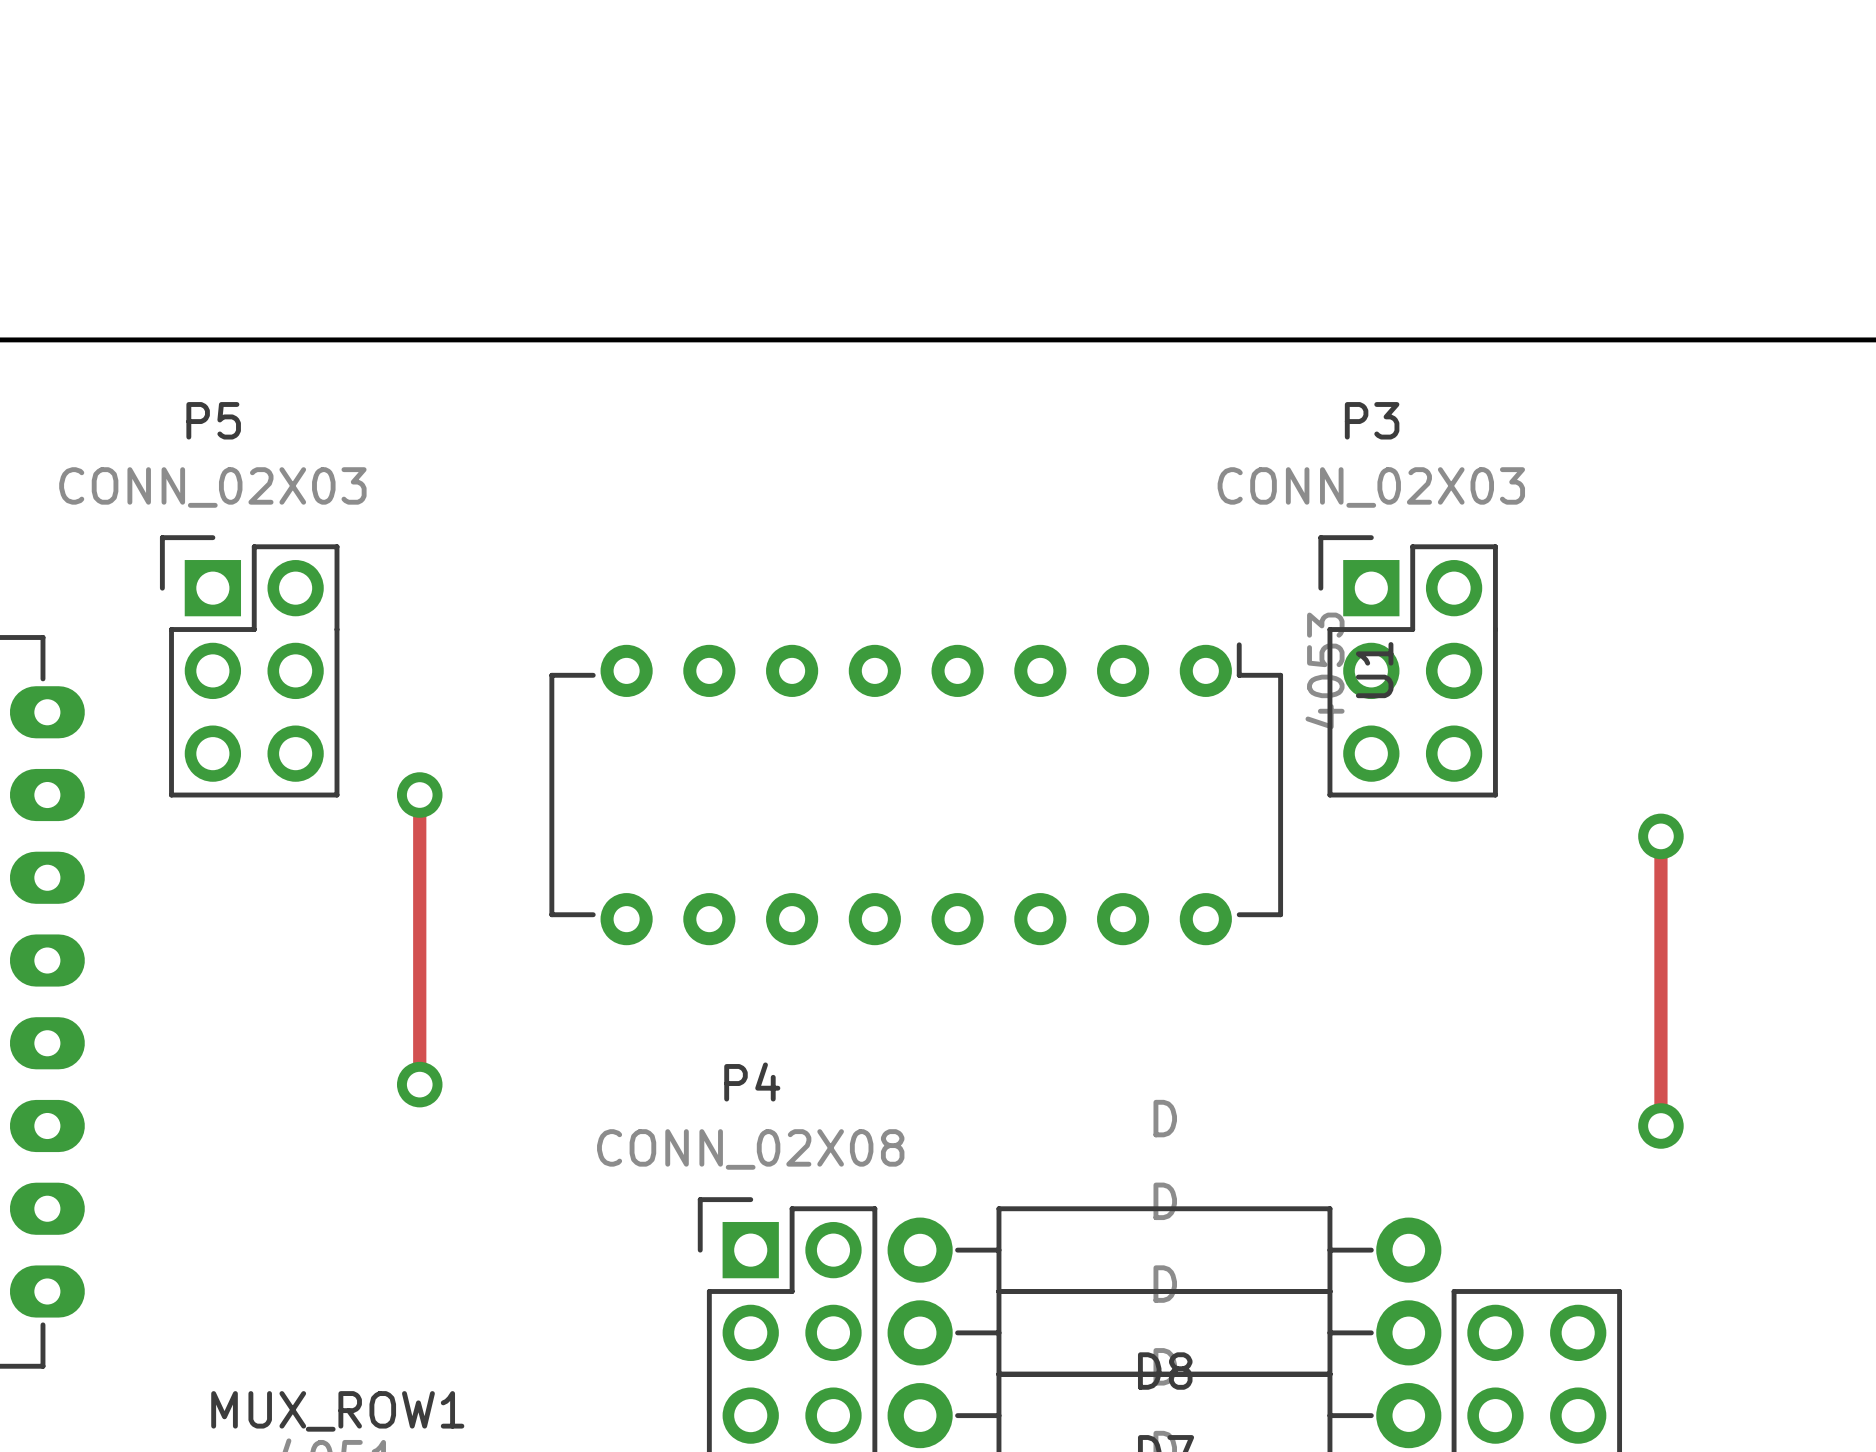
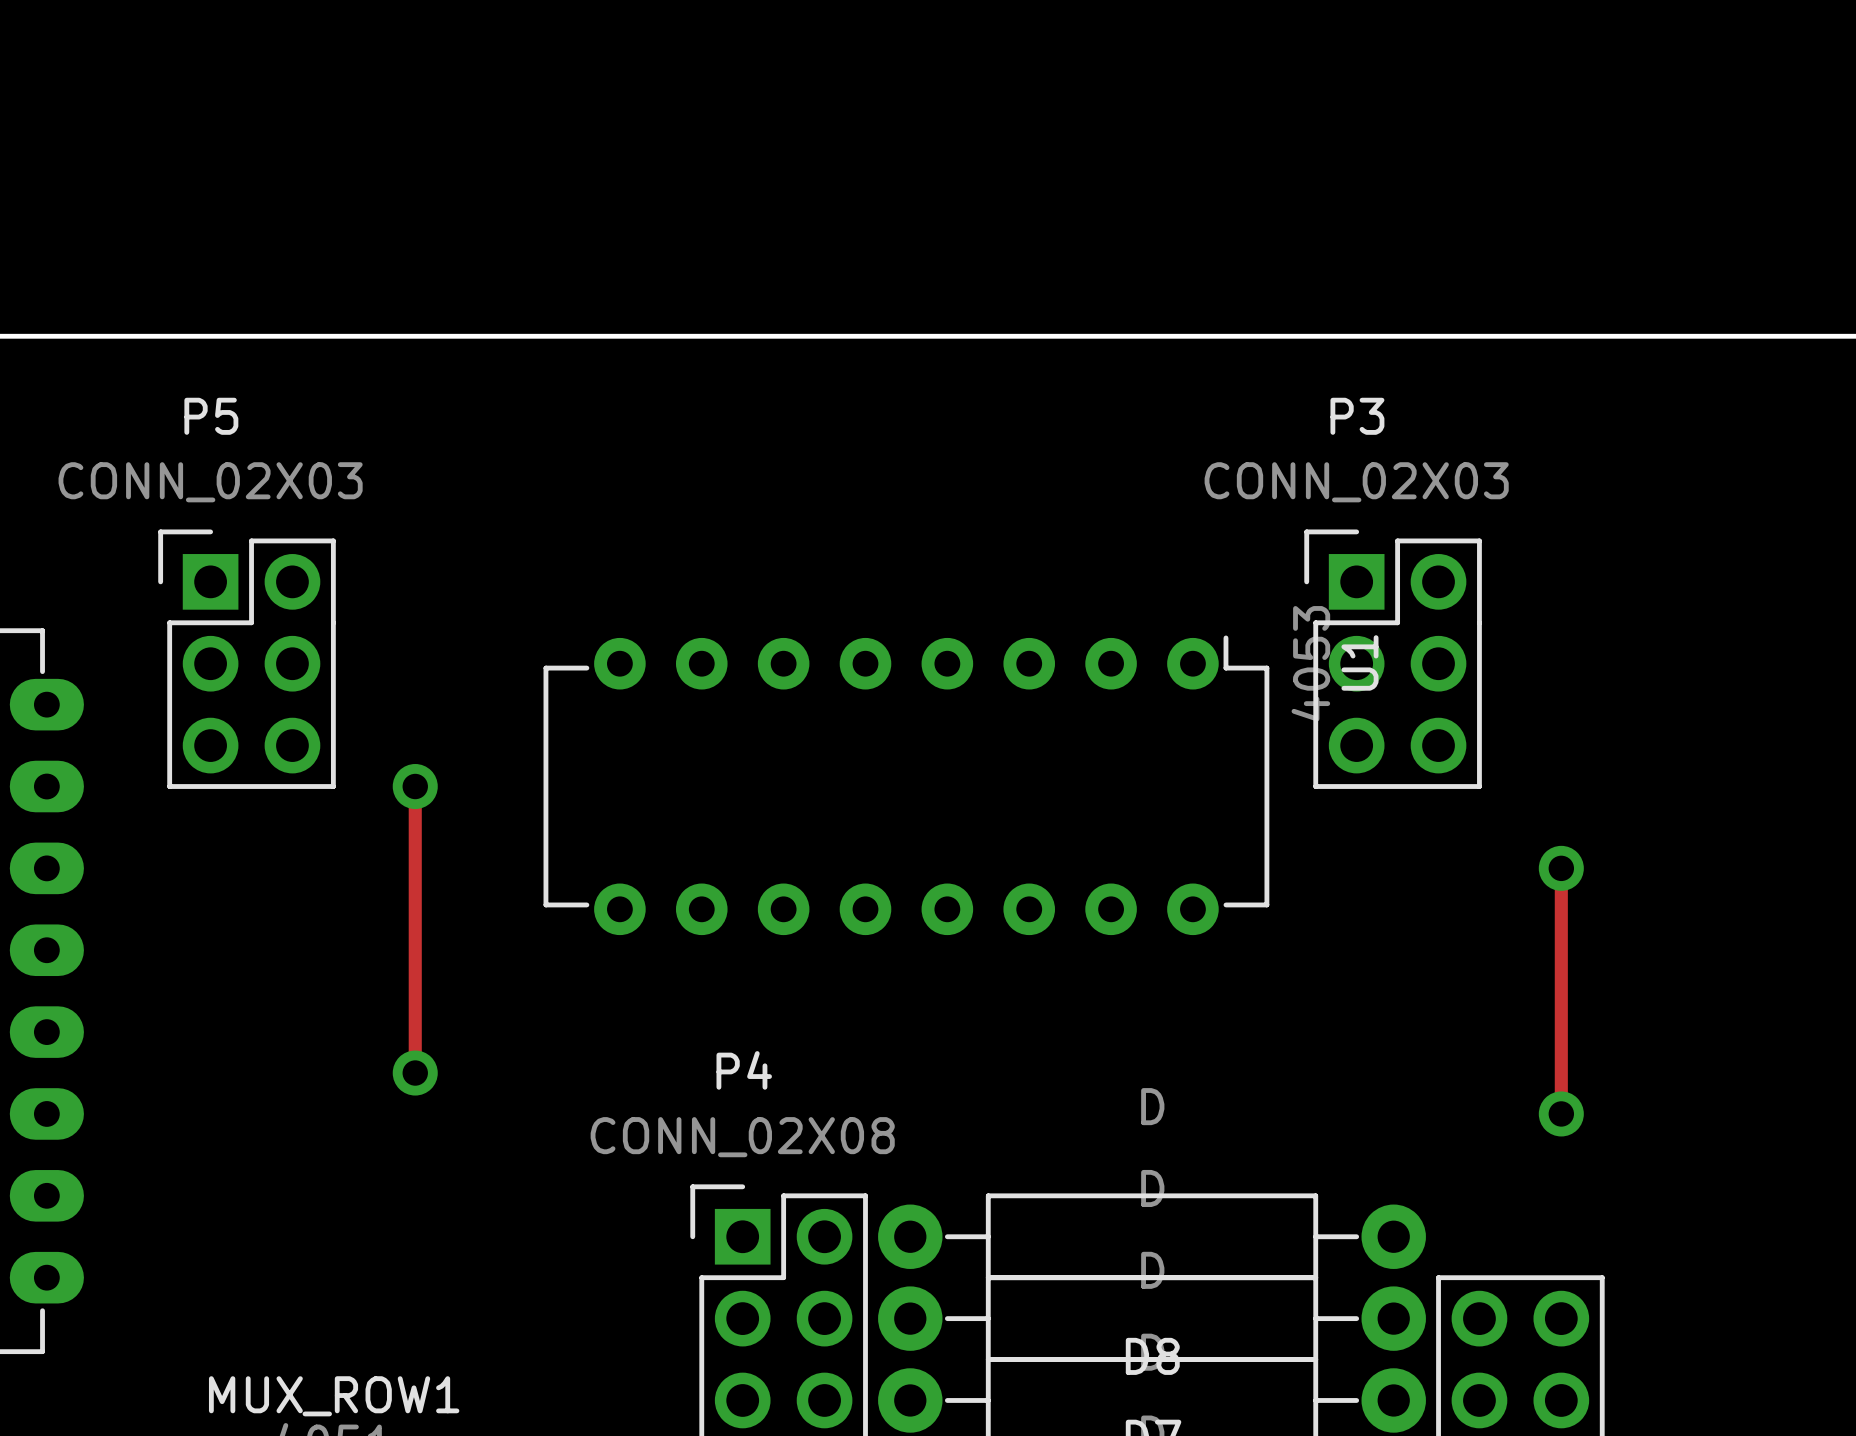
track: (1660, 836) (1660, 1126) -> none
via position: (1660, 836) -> (1561, 868)
track: none -> (1561, 868) (1561, 1113)
via position: (1660, 1126) -> (1561, 1113)

